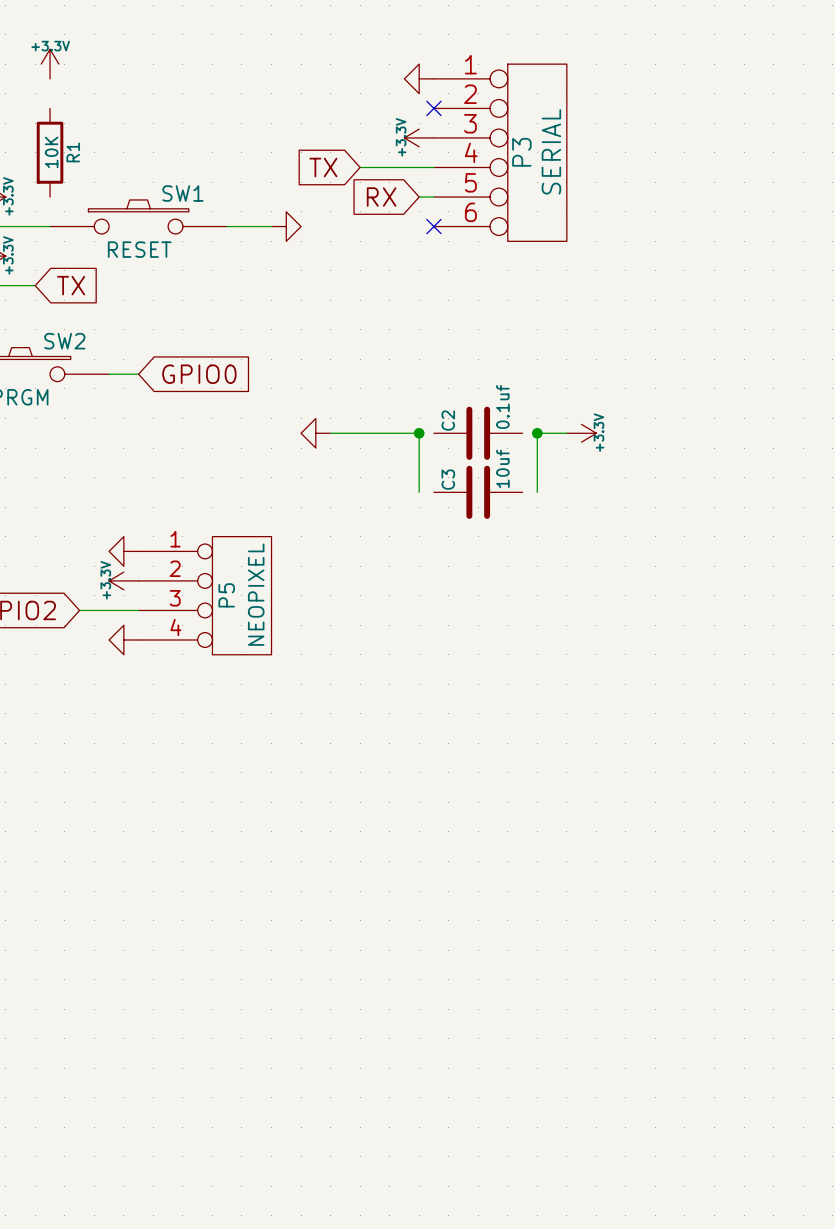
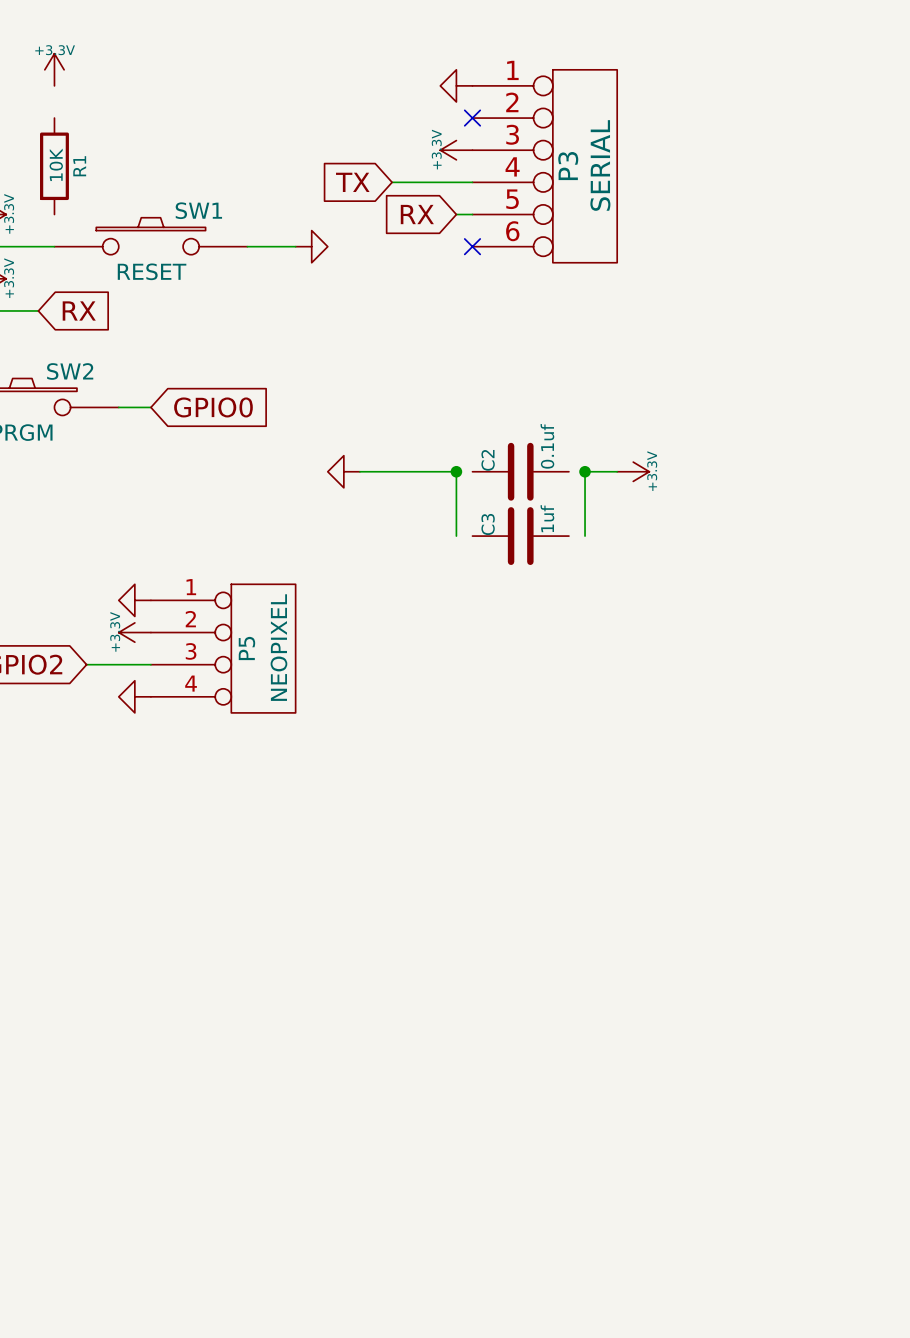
global label: TX (71, 285) -> RX (79, 310)
C3 value: 10uf (502, 468) -> 1uf (547, 518)

